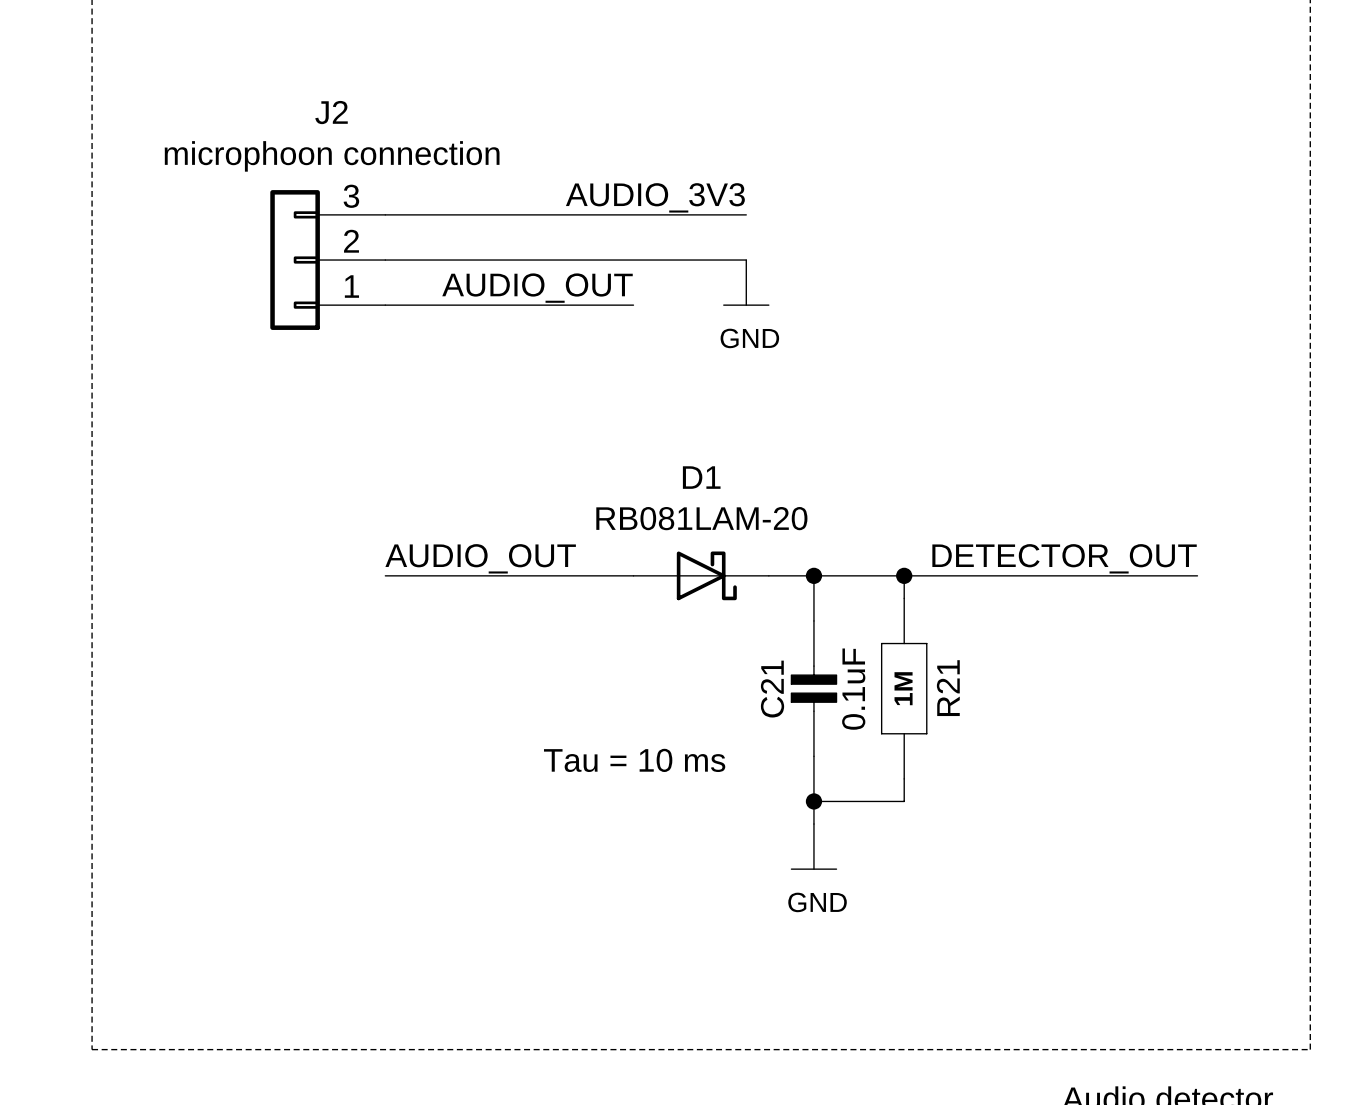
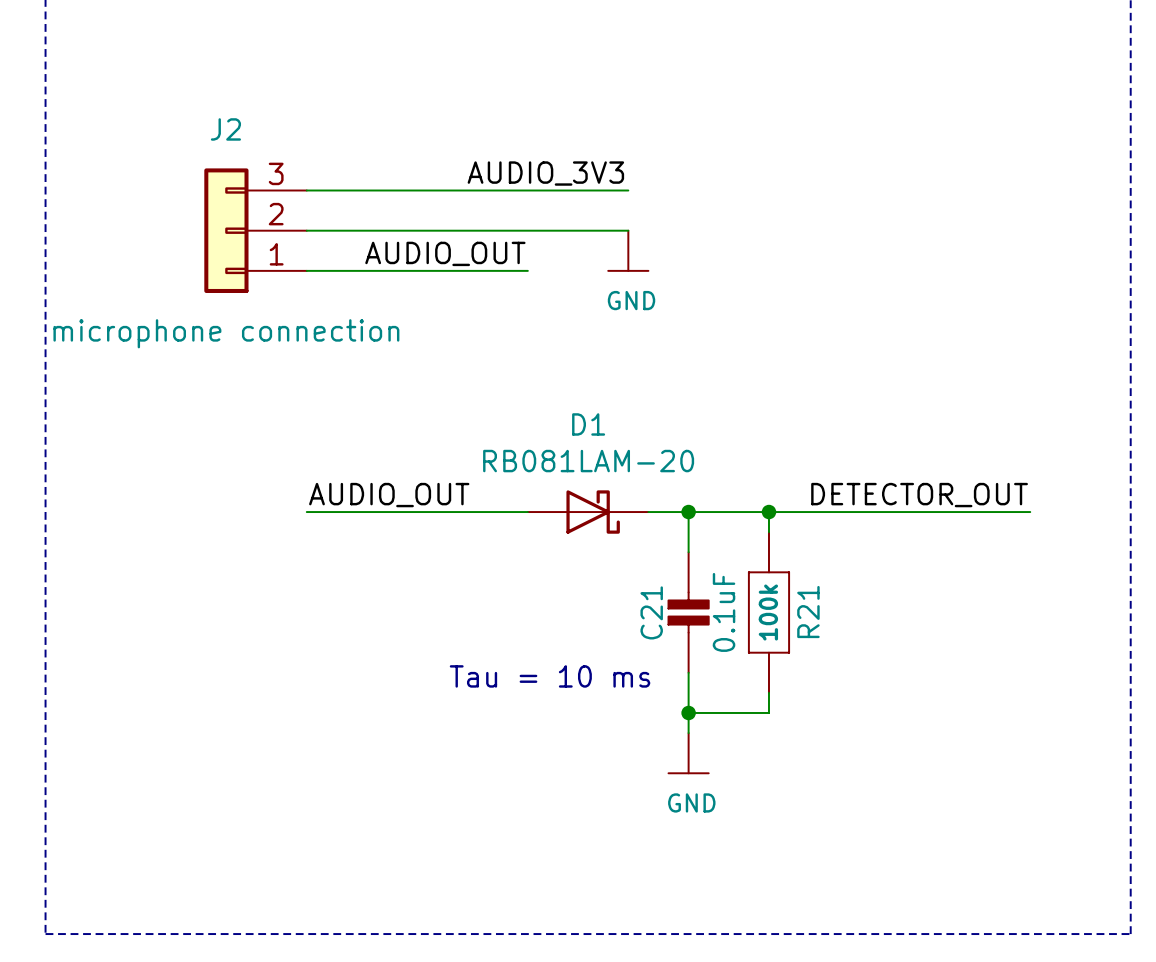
J2 name position: J2 (331, 112) -> J2 (225, 129)
J2 value: microphoon connection (332, 156) -> microphone connection (226, 333)
R21 value: 1M (903, 688) -> 100k (768, 612)

